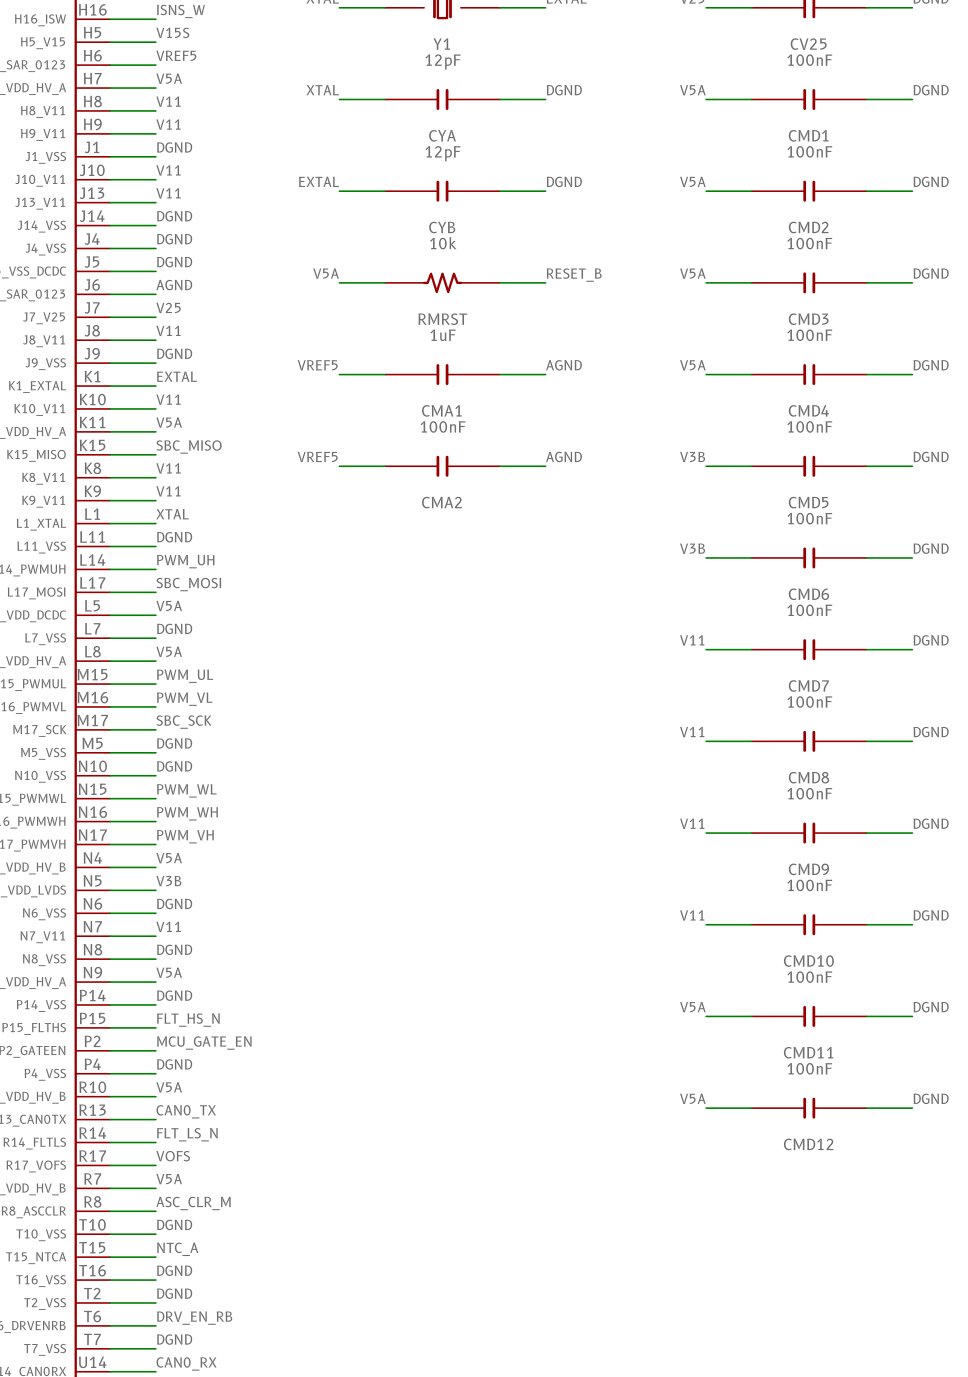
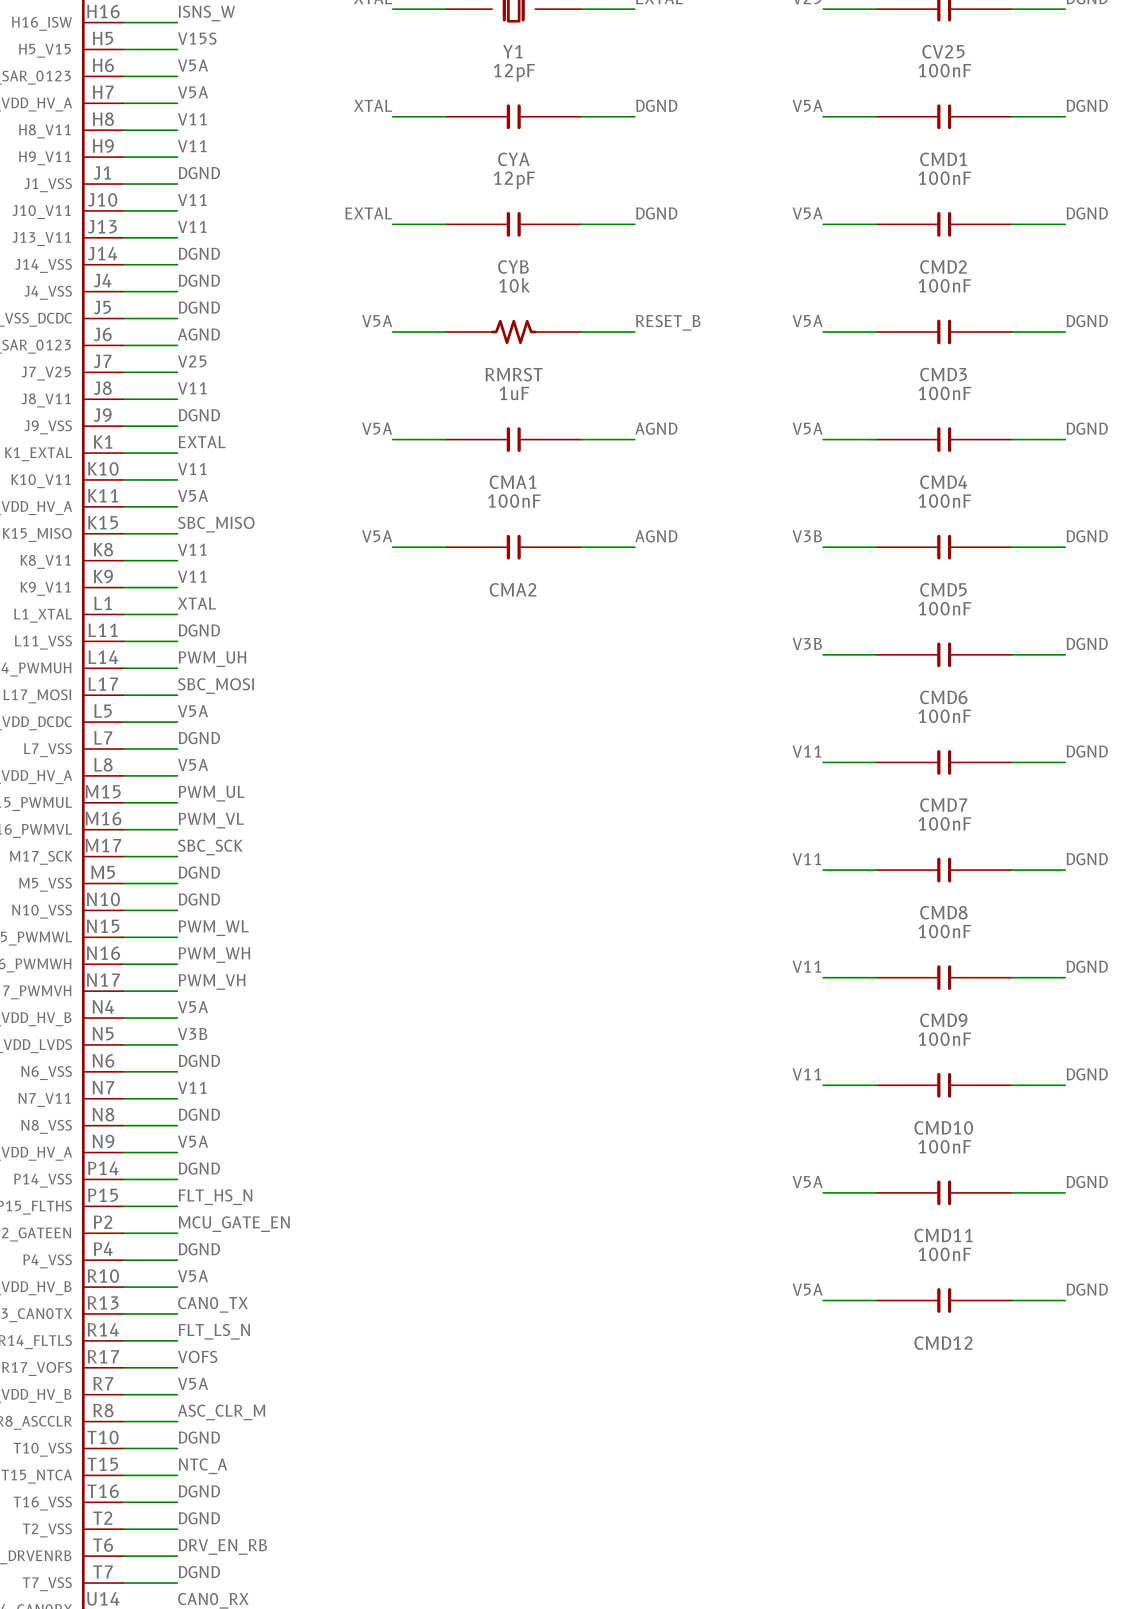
label: VREF5 (176, 55) -> V5A (192, 65)
label: VREF5 (317, 365) -> V5A (377, 428)
label: VREF5 (317, 456) -> V5A (377, 536)

